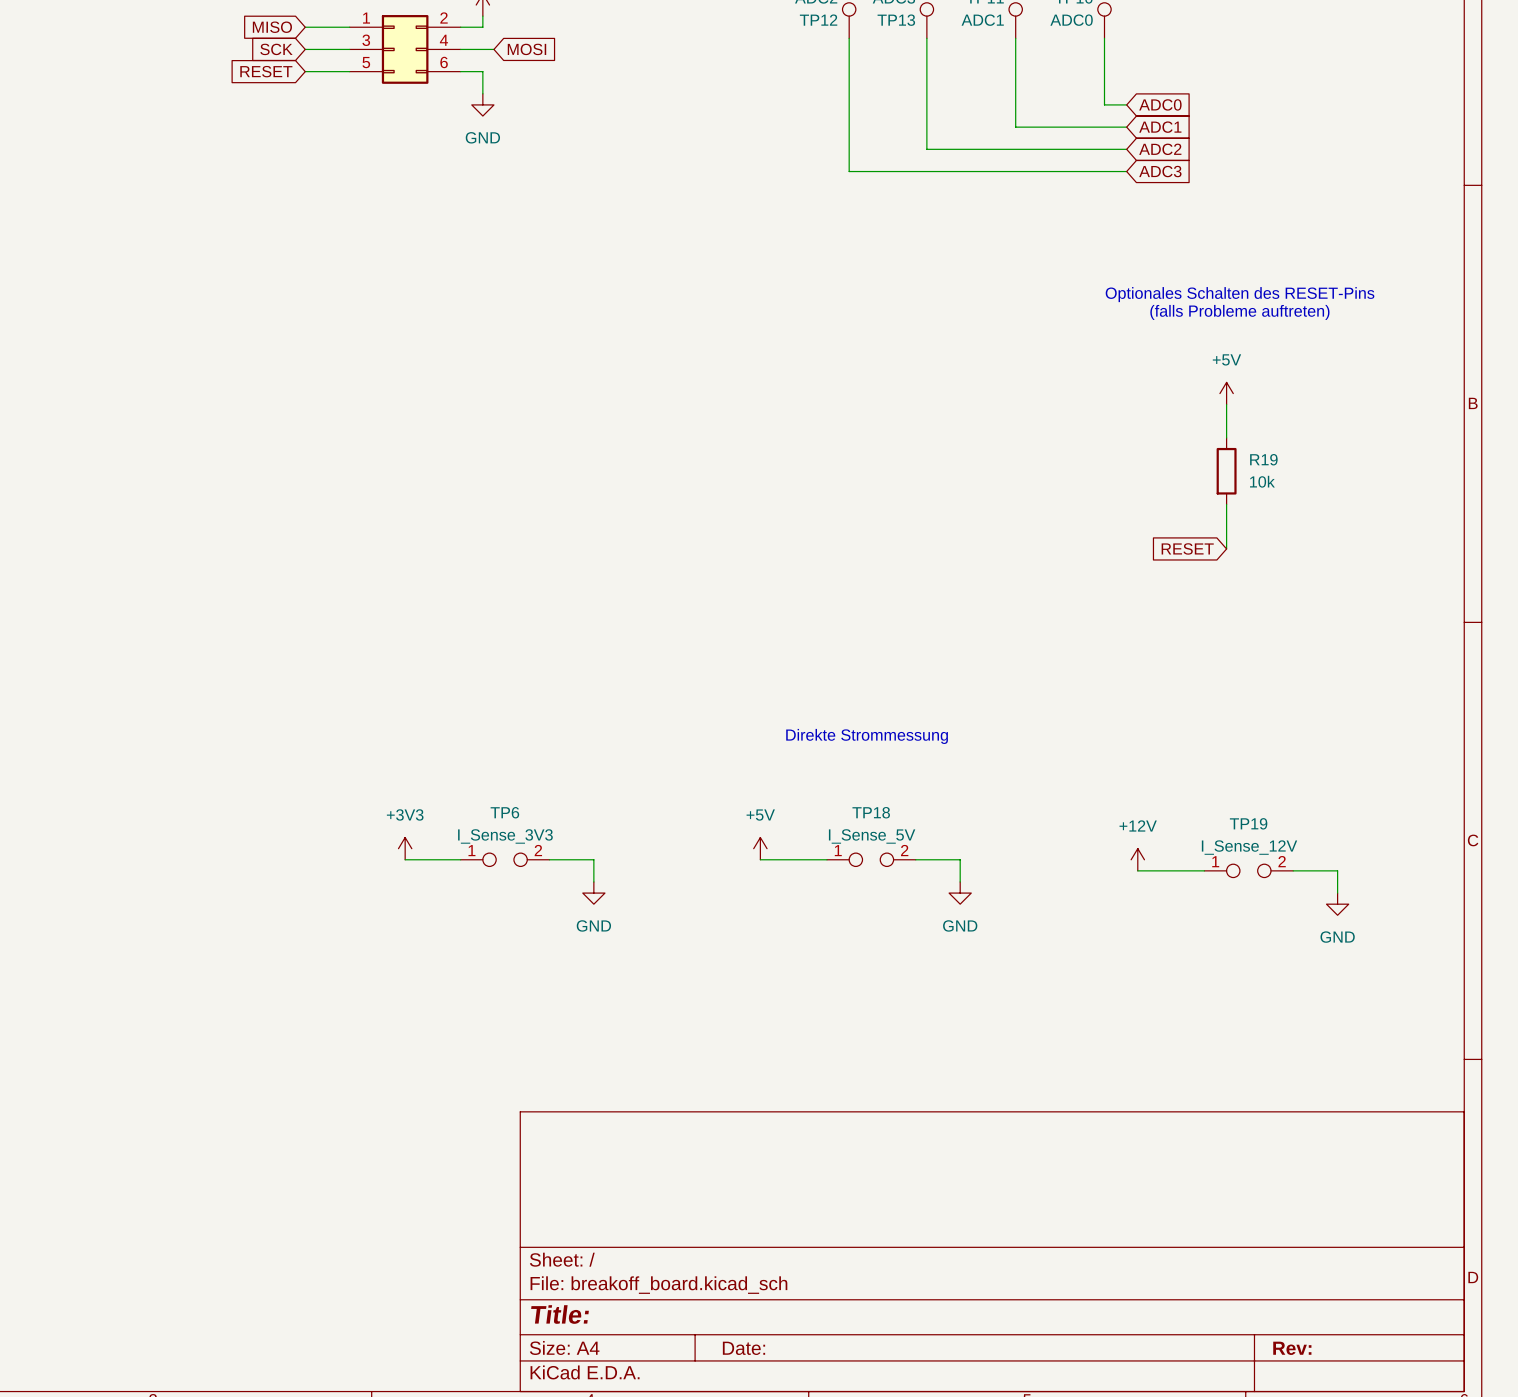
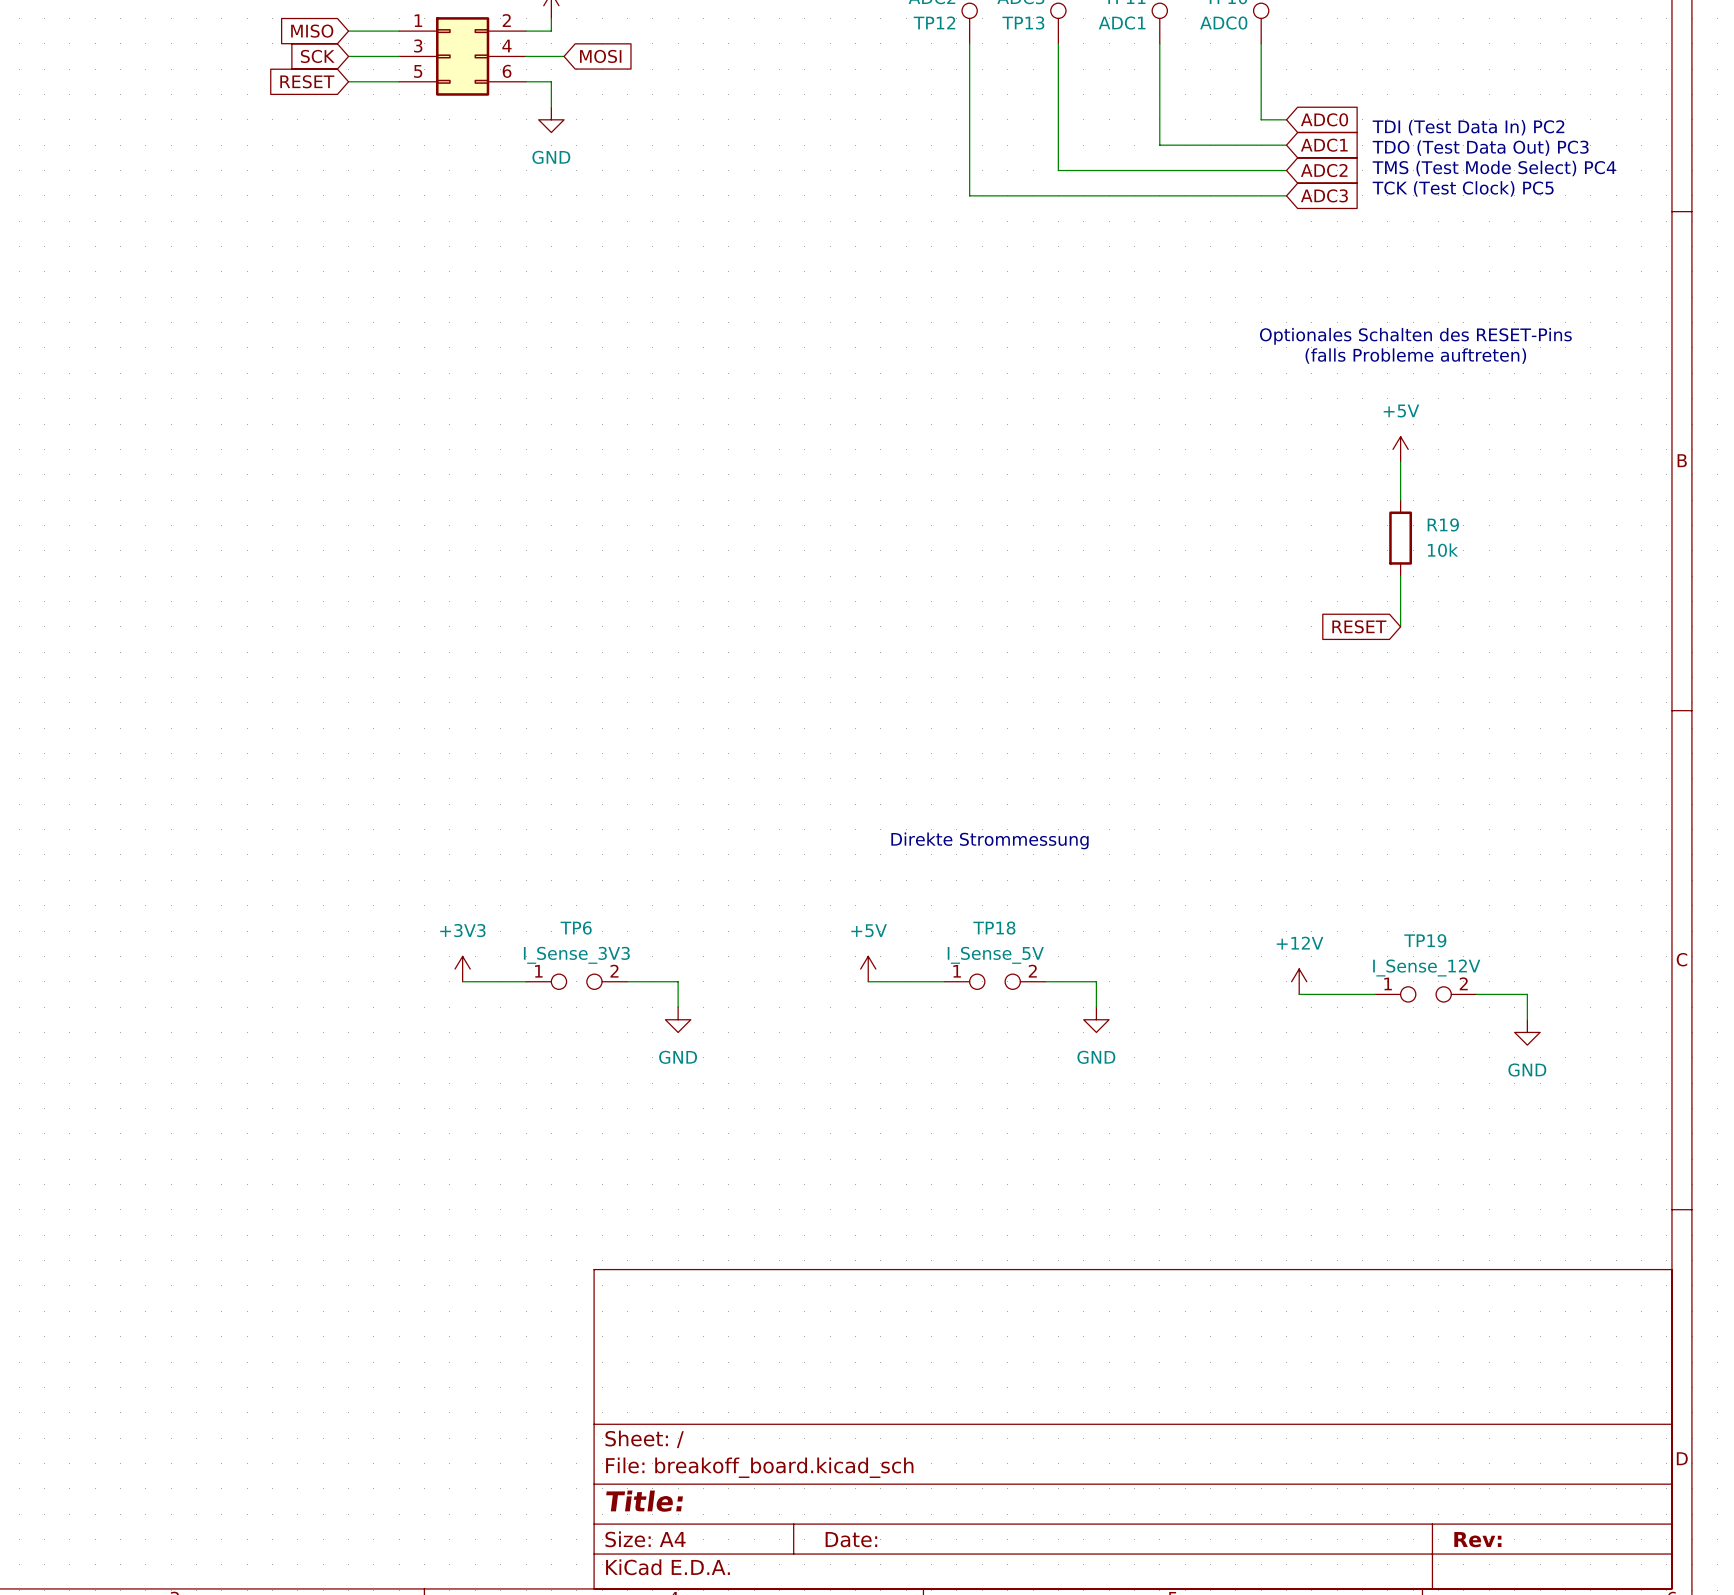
text: none -> TDI (Test Data In) PC2 (1468, 127)
text: none -> TDO (Test Data Out) PC3 (1480, 148)
text: none -> TMS (Test Mode Select) PC4 (1494, 168)
text: none -> TCK (Test Clock) PC5 (1463, 188)

